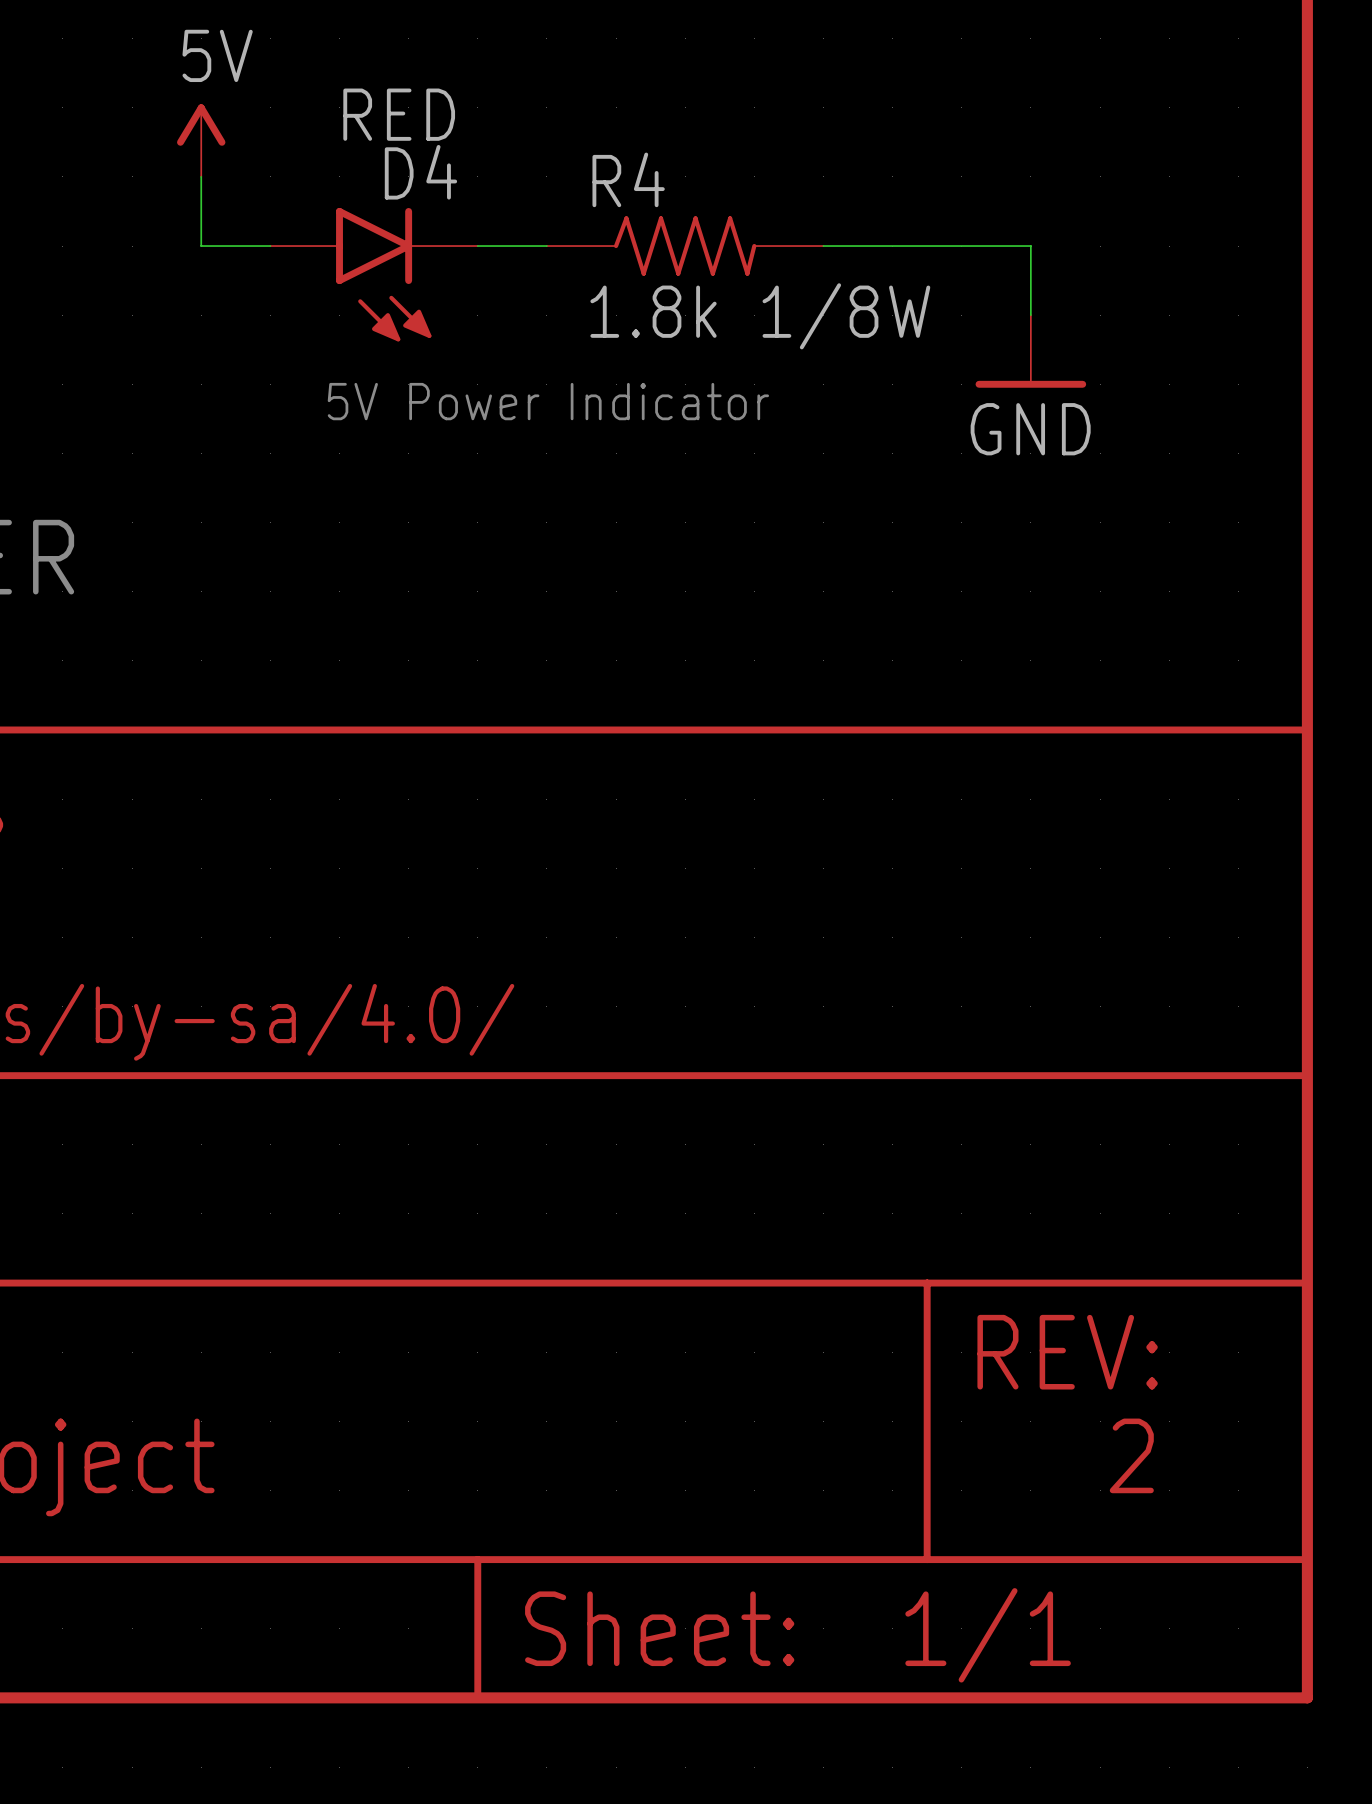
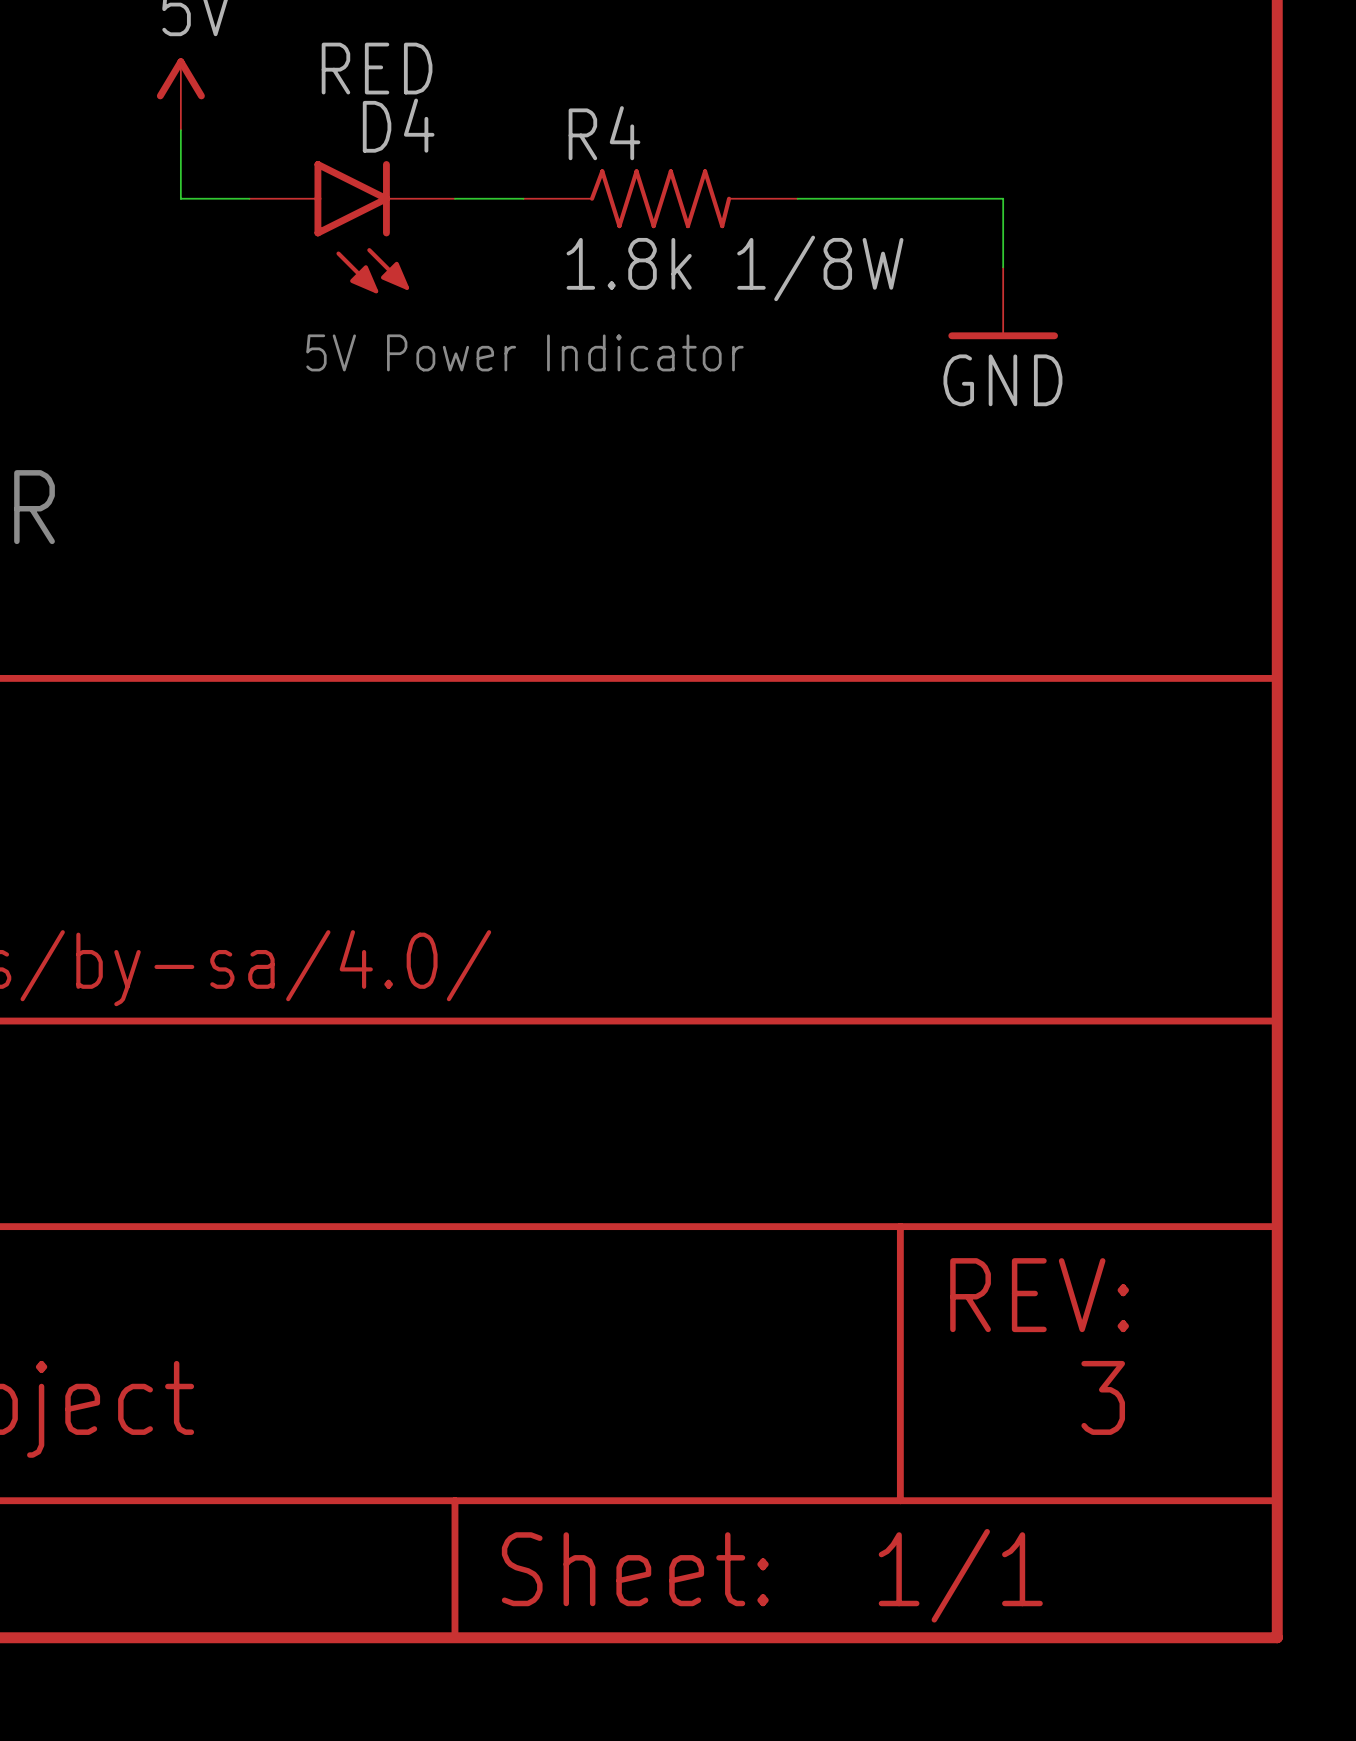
text: 2 (1131, 1455) -> 3 (1103, 1397)

